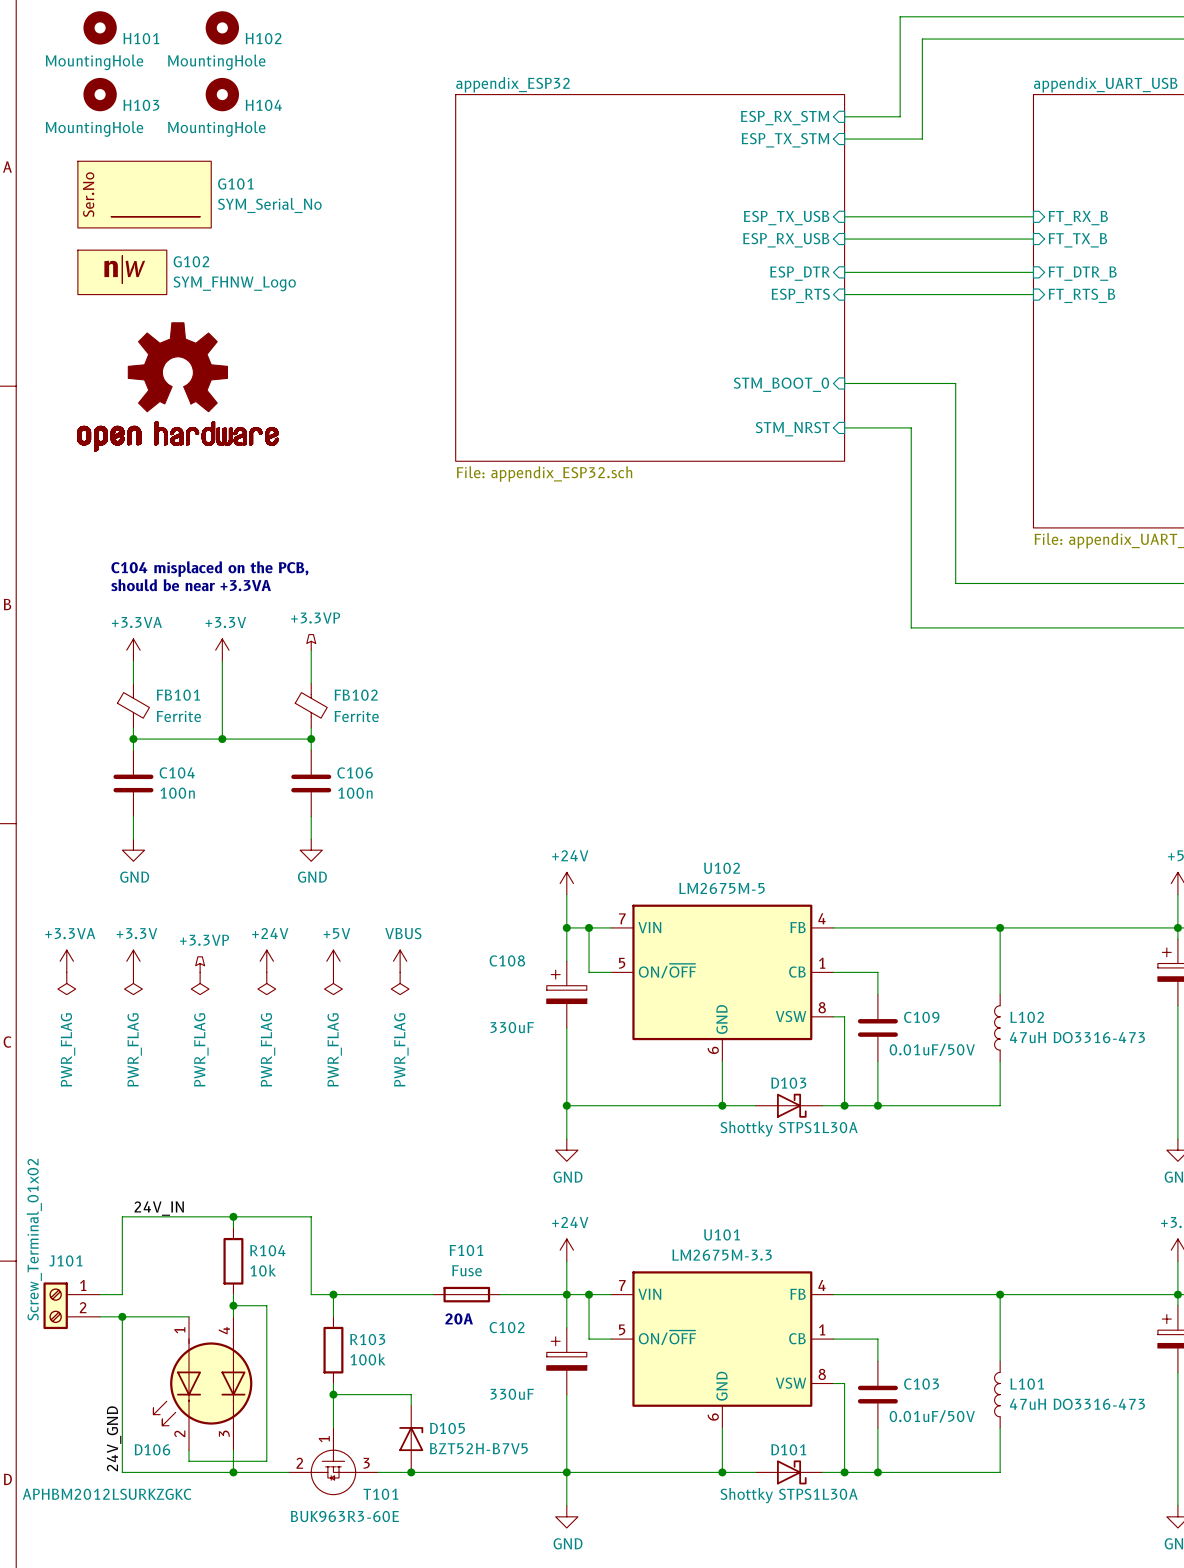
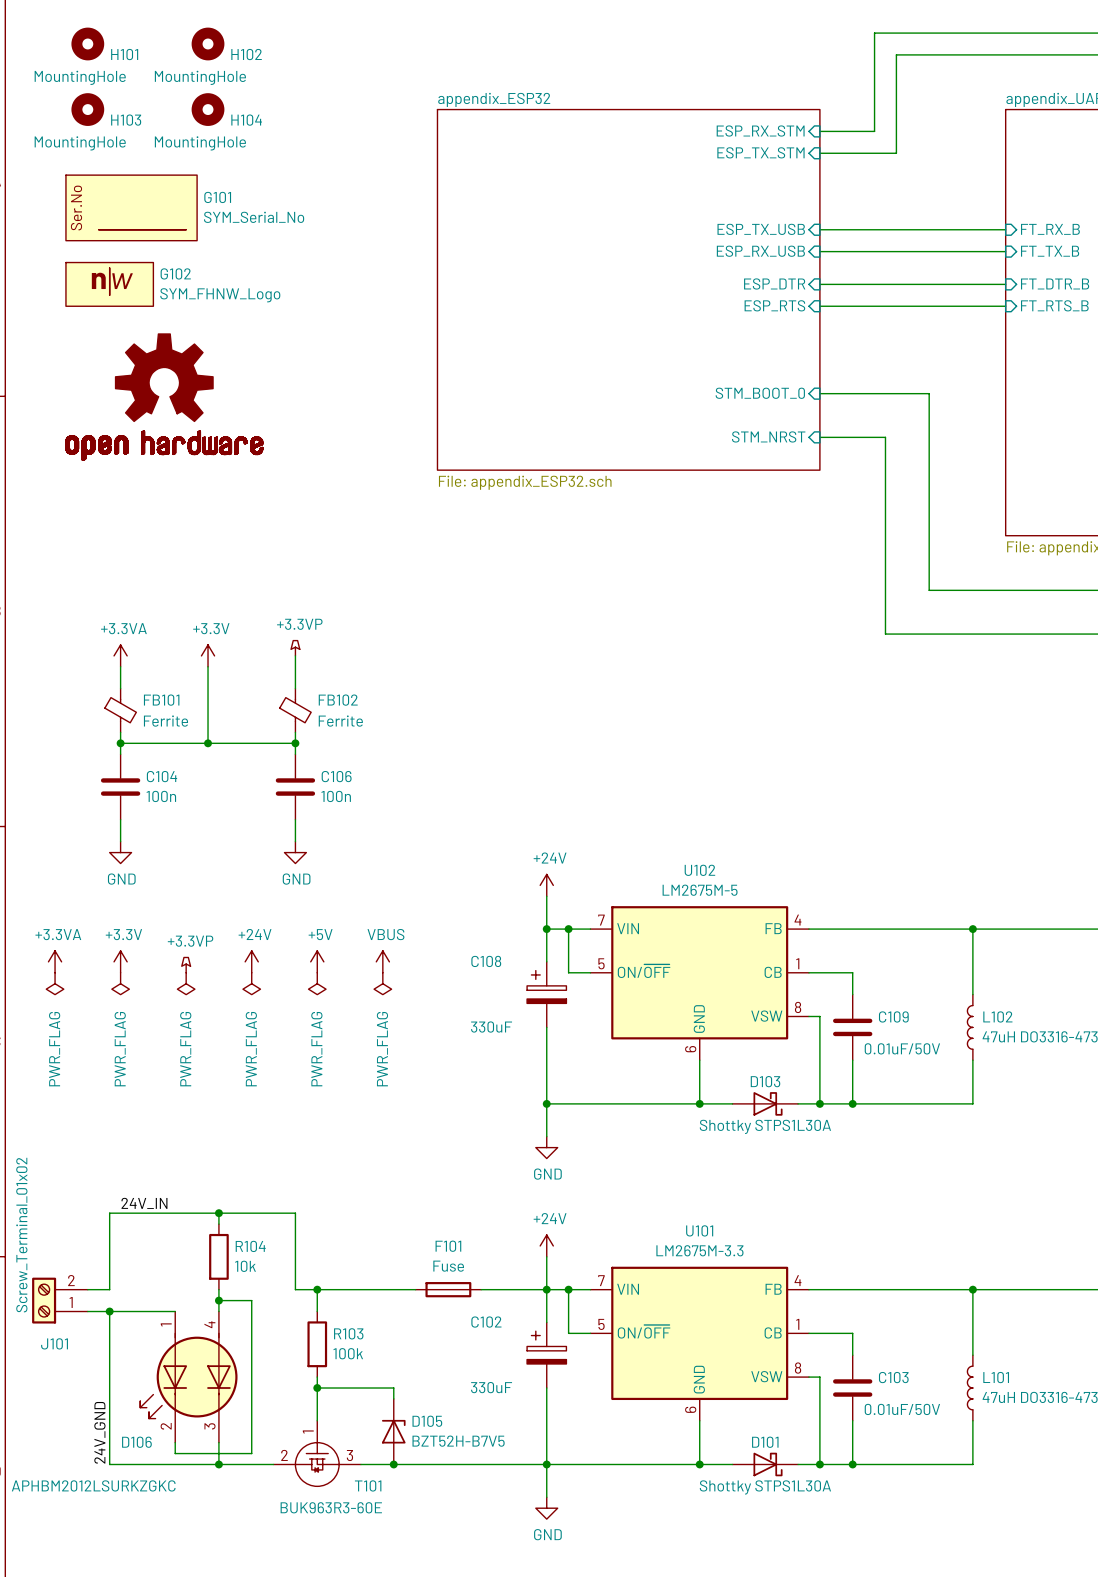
text: C104 misplaced on the PCB, (209, 569) -> none
text: should be near +3.3VA (191, 585) -> none
J101 flip: as is (55, 1305) -> up-down (44, 1300)
text: 20A (459, 1318) -> none

